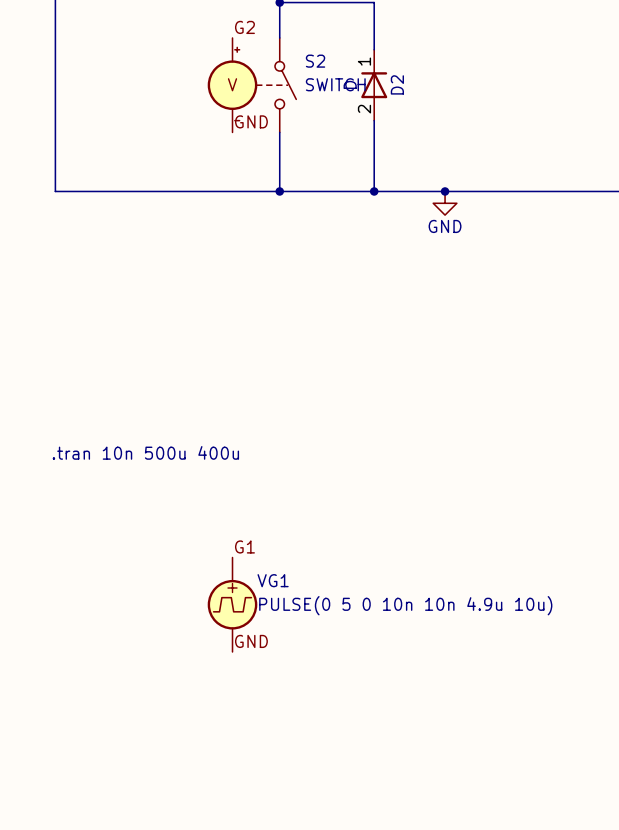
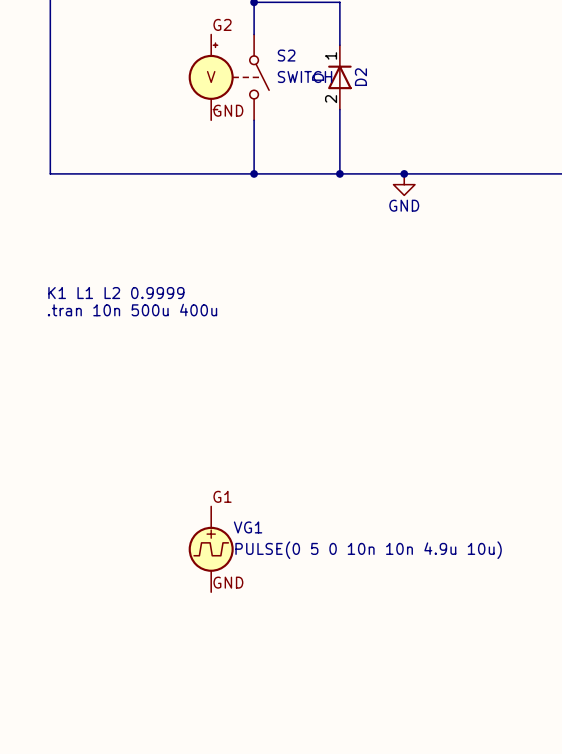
text: none -> K1 L1 L2 0.9999 (116, 293)
text position: .tran 10n 500u 400u (145, 452) -> .tran 10n 500u 400u (132, 310)

